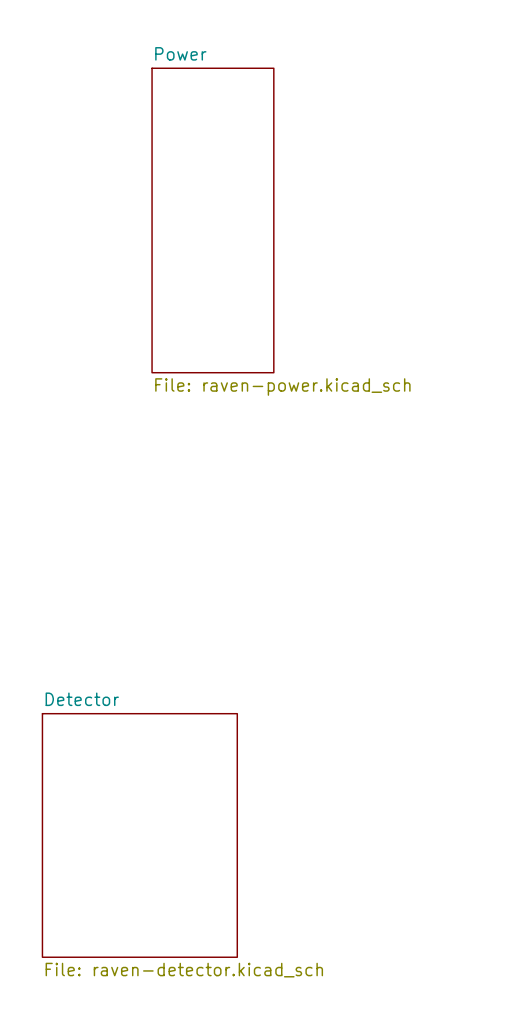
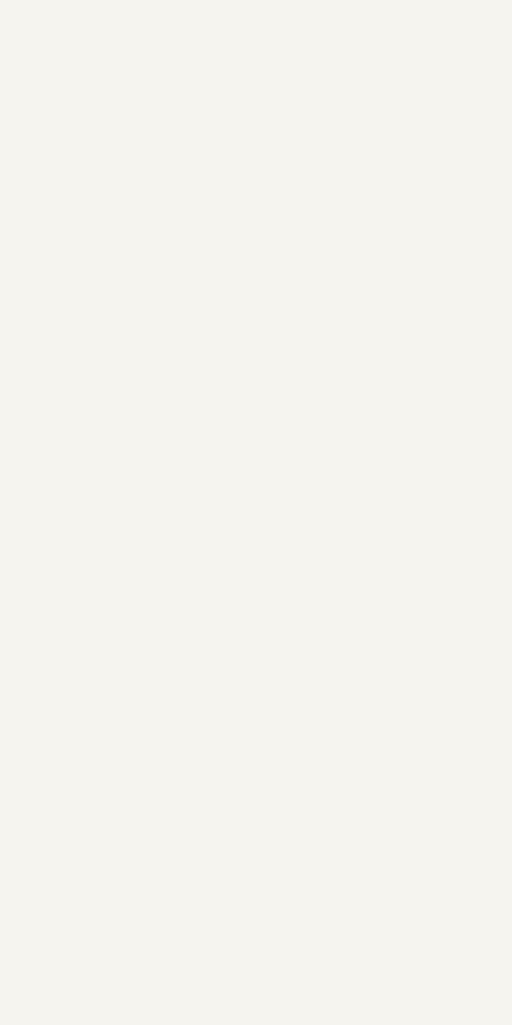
sheet Power: File: raven-power.kicad_sch (212, 220) -> none
sheet Detector: File: raven-detector.kicad_sch (139, 835) -> none

